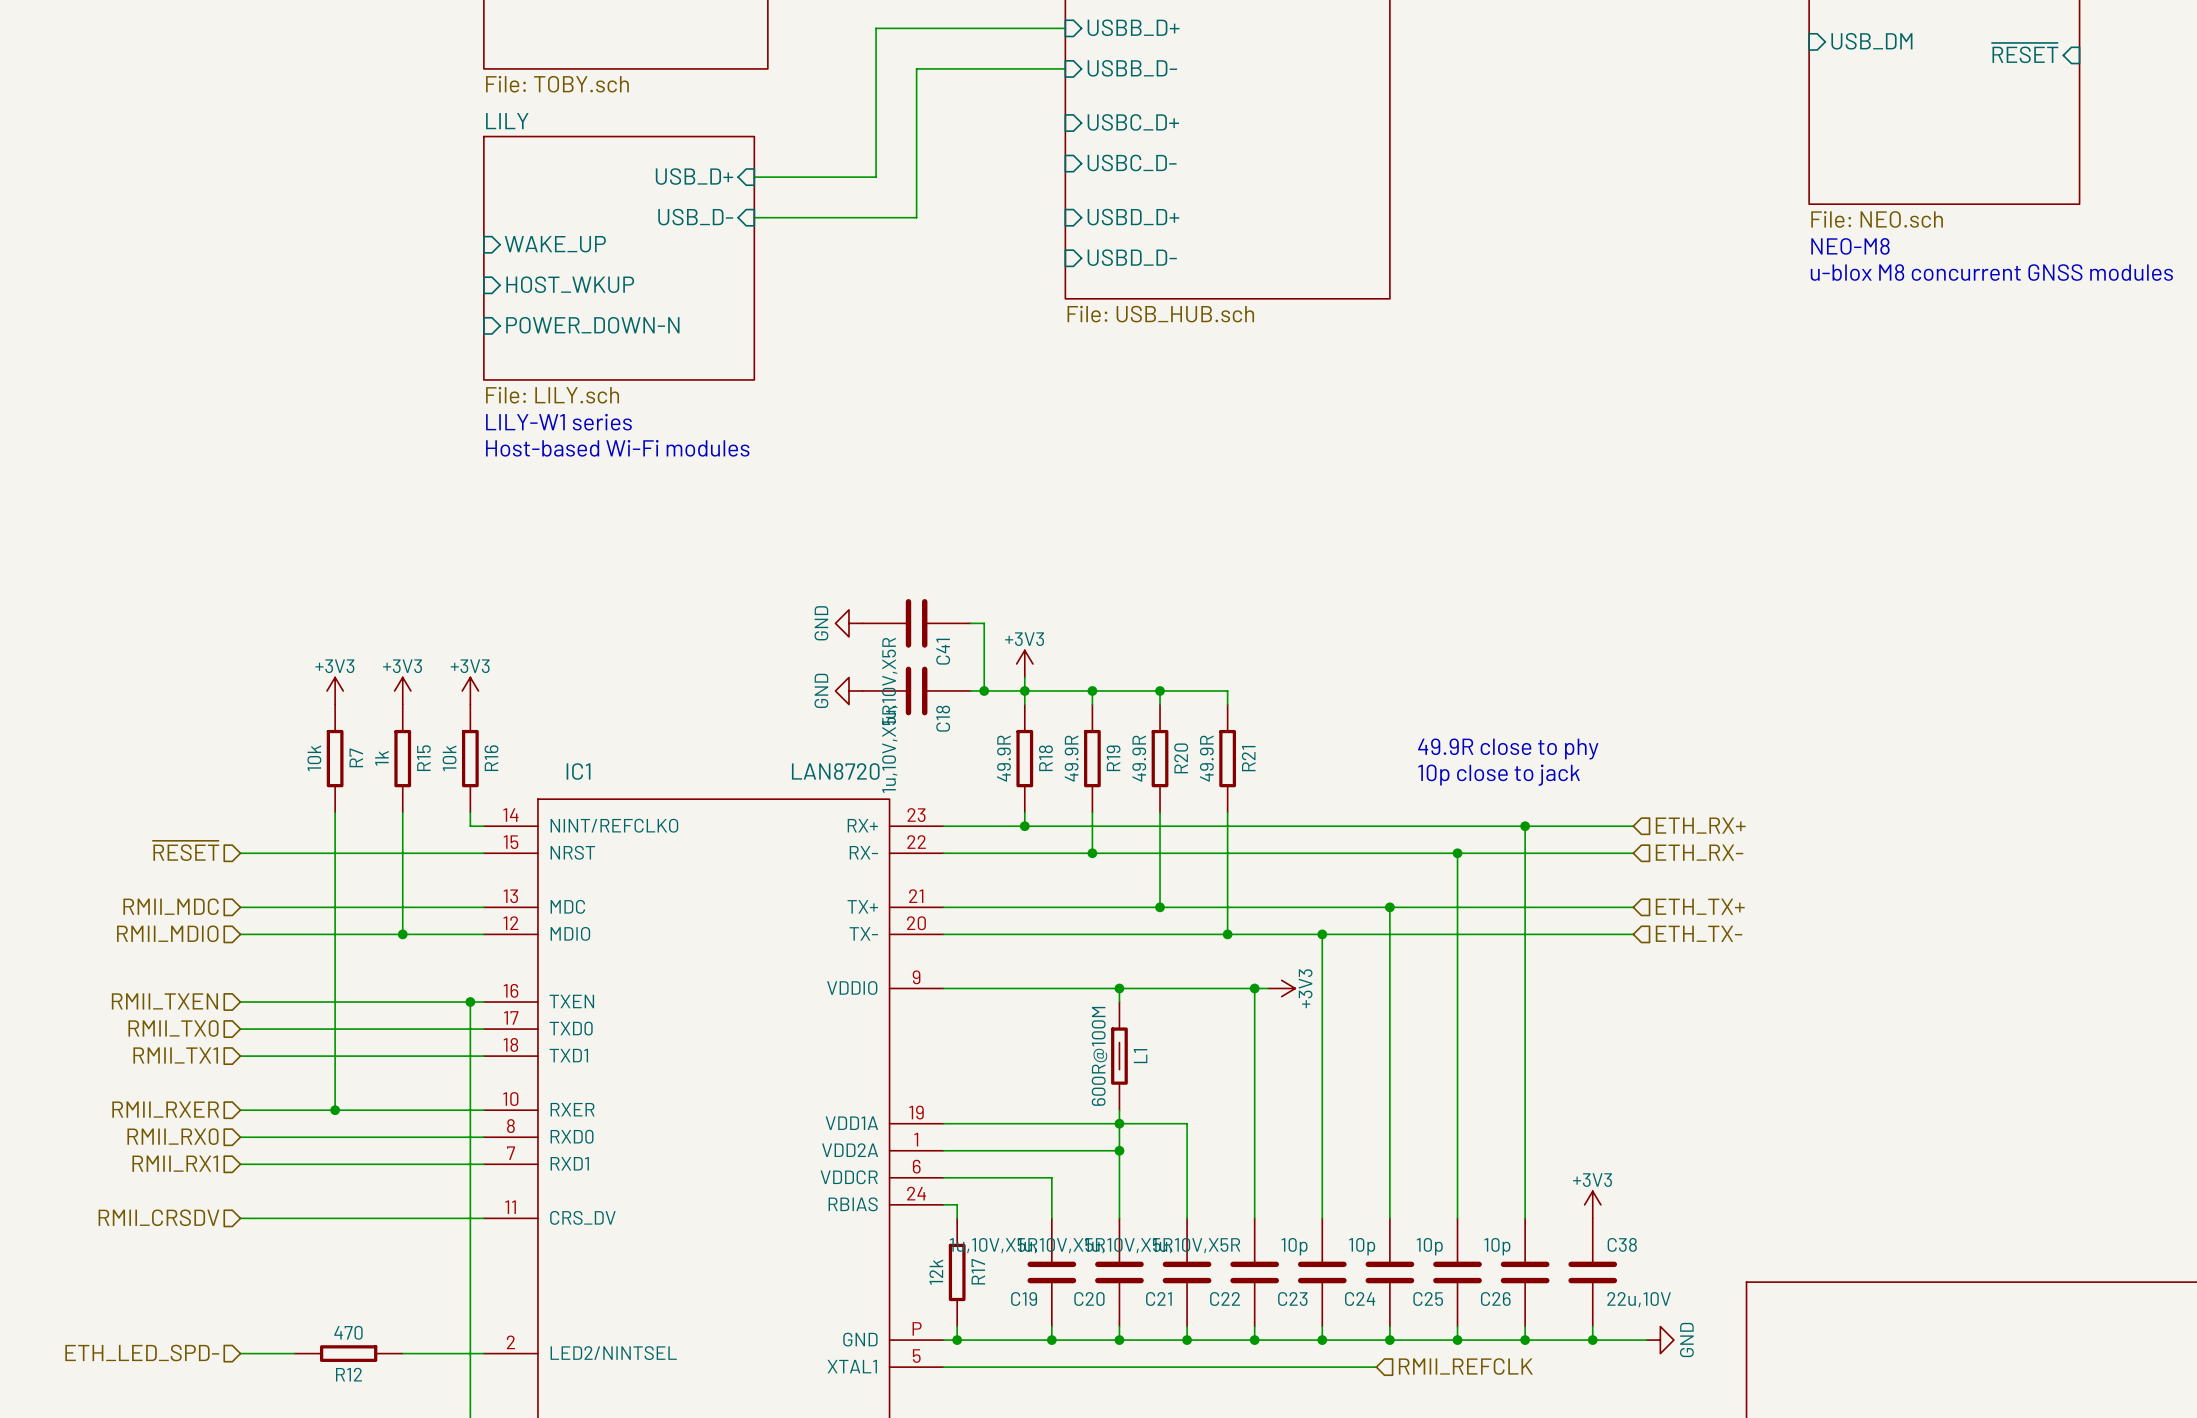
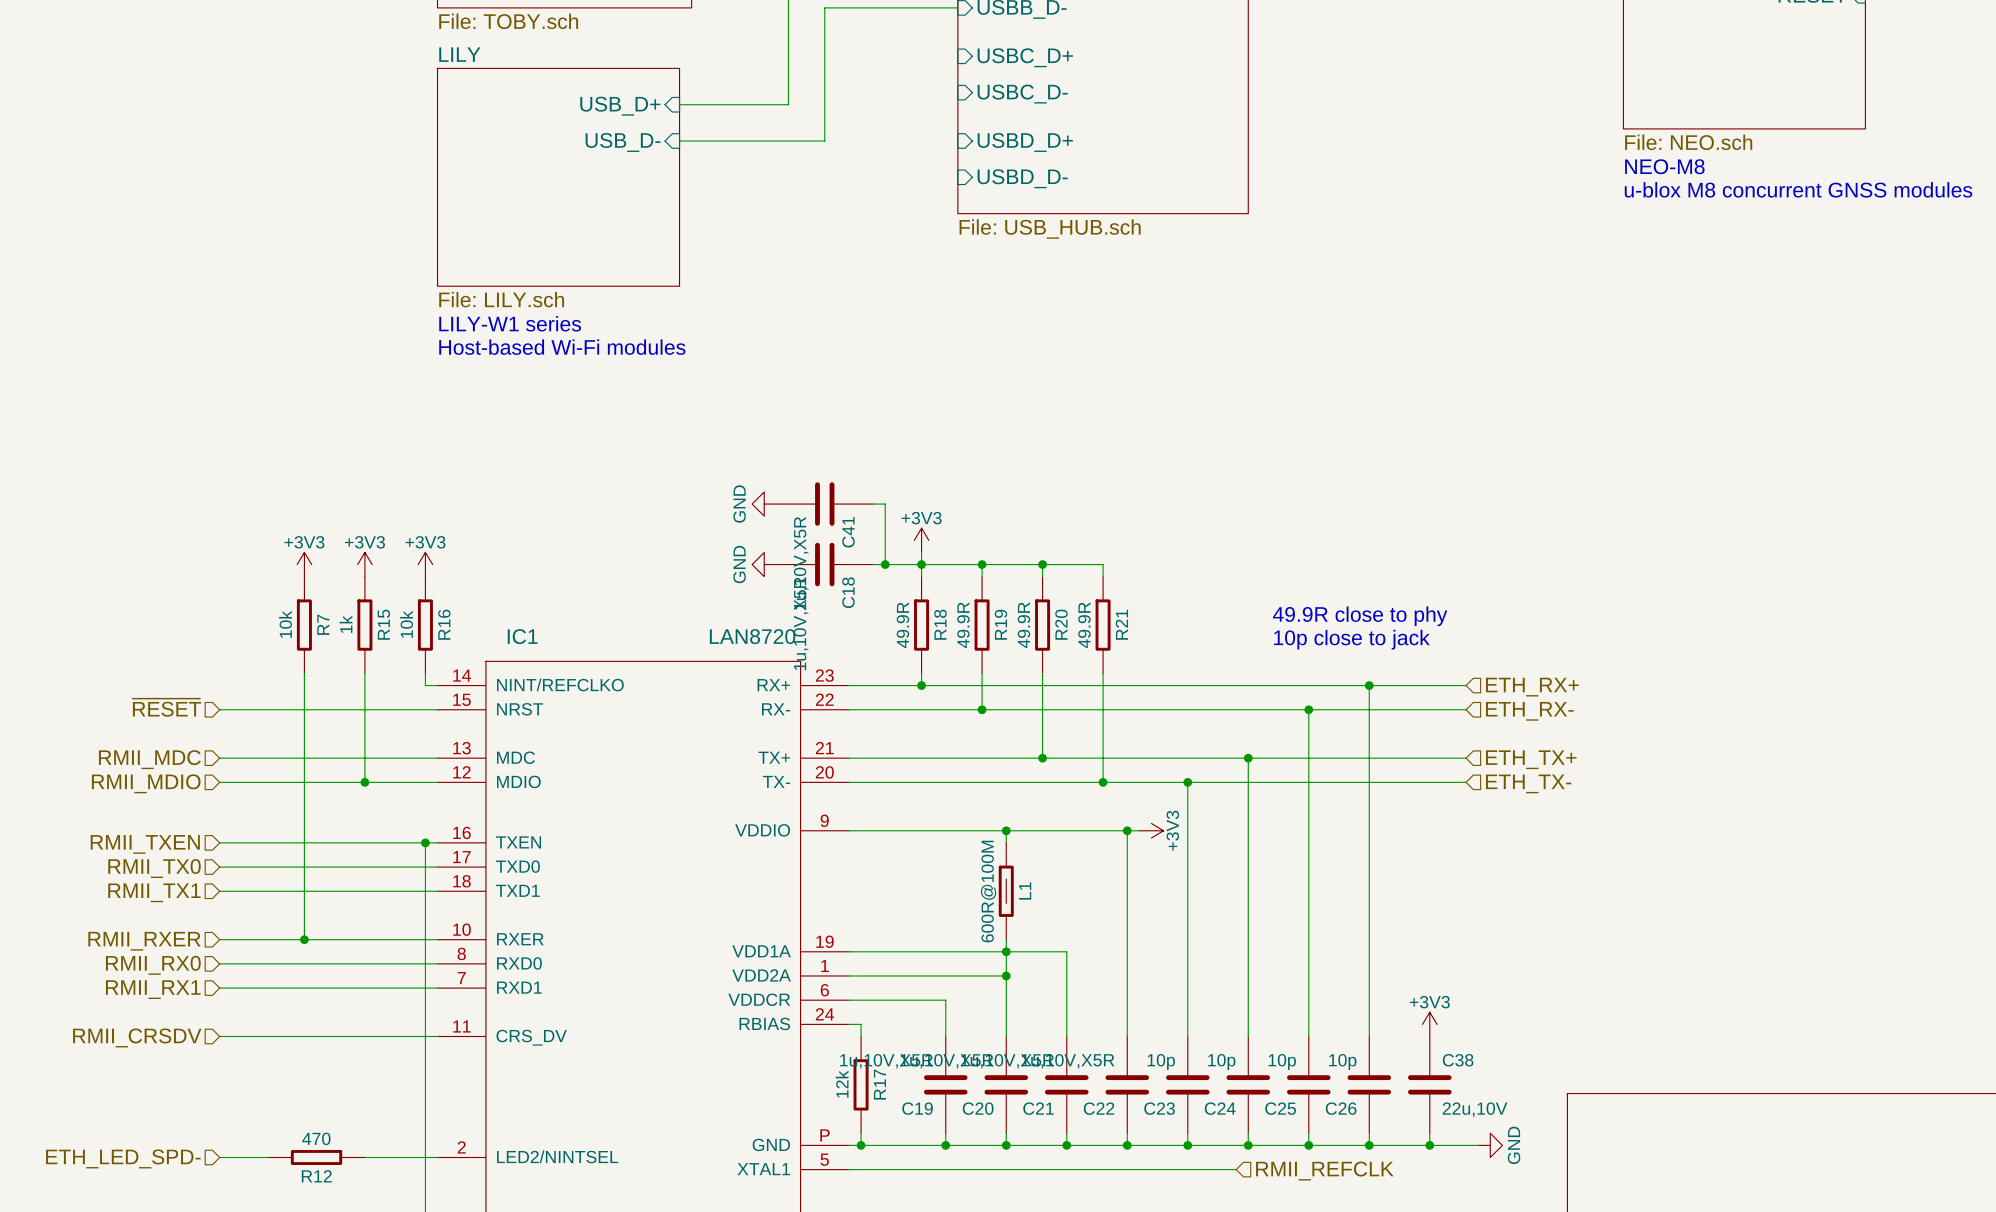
sheet pin: WAKE_UP (555, 244) -> none
sheet pin: HOST_WKUP (570, 284) -> none
sheet pin: POWER_DOWN-N (592, 325) -> none

